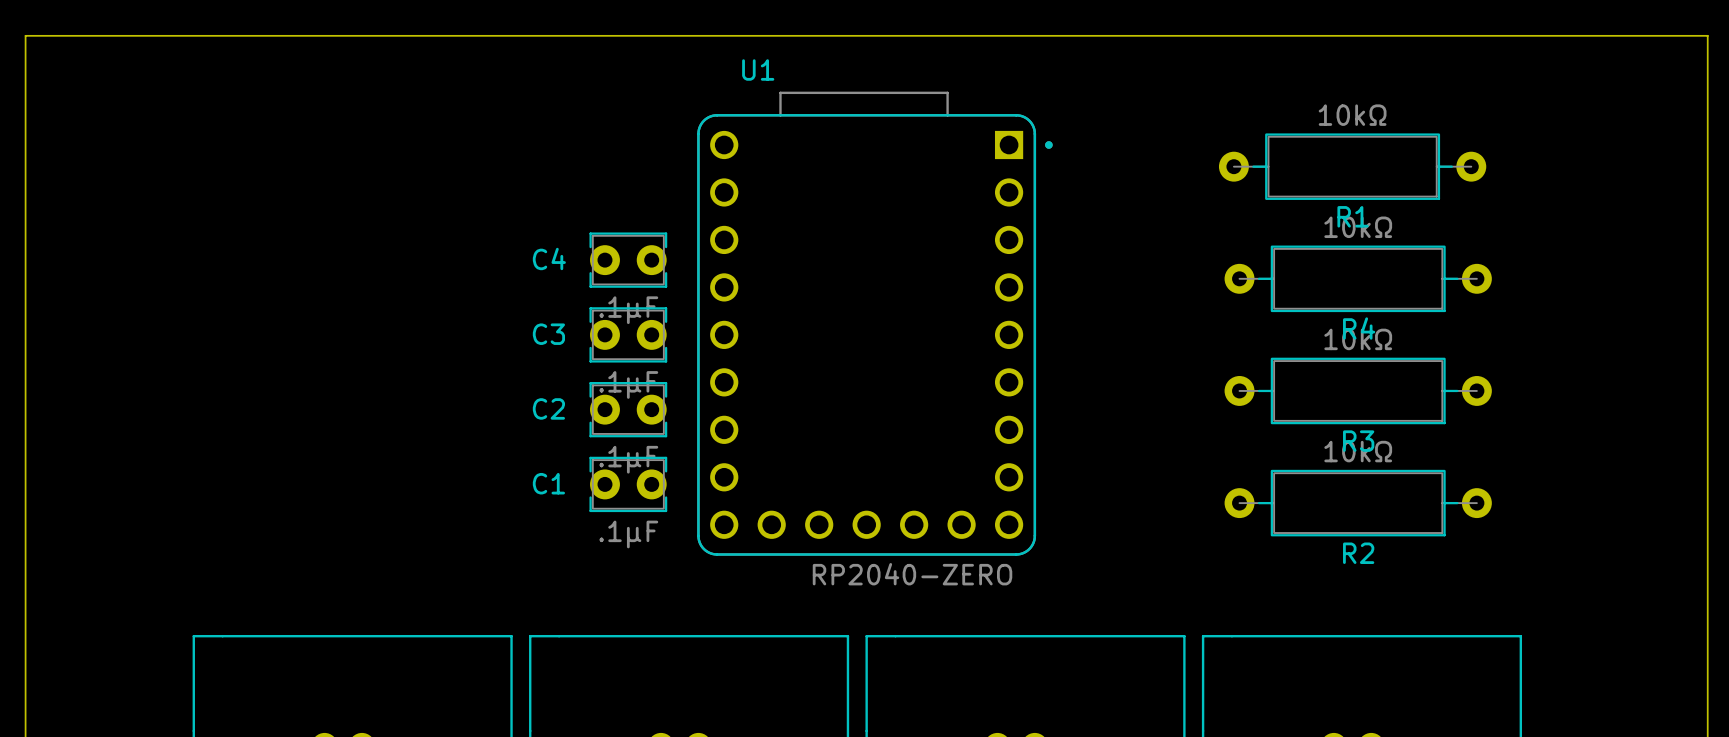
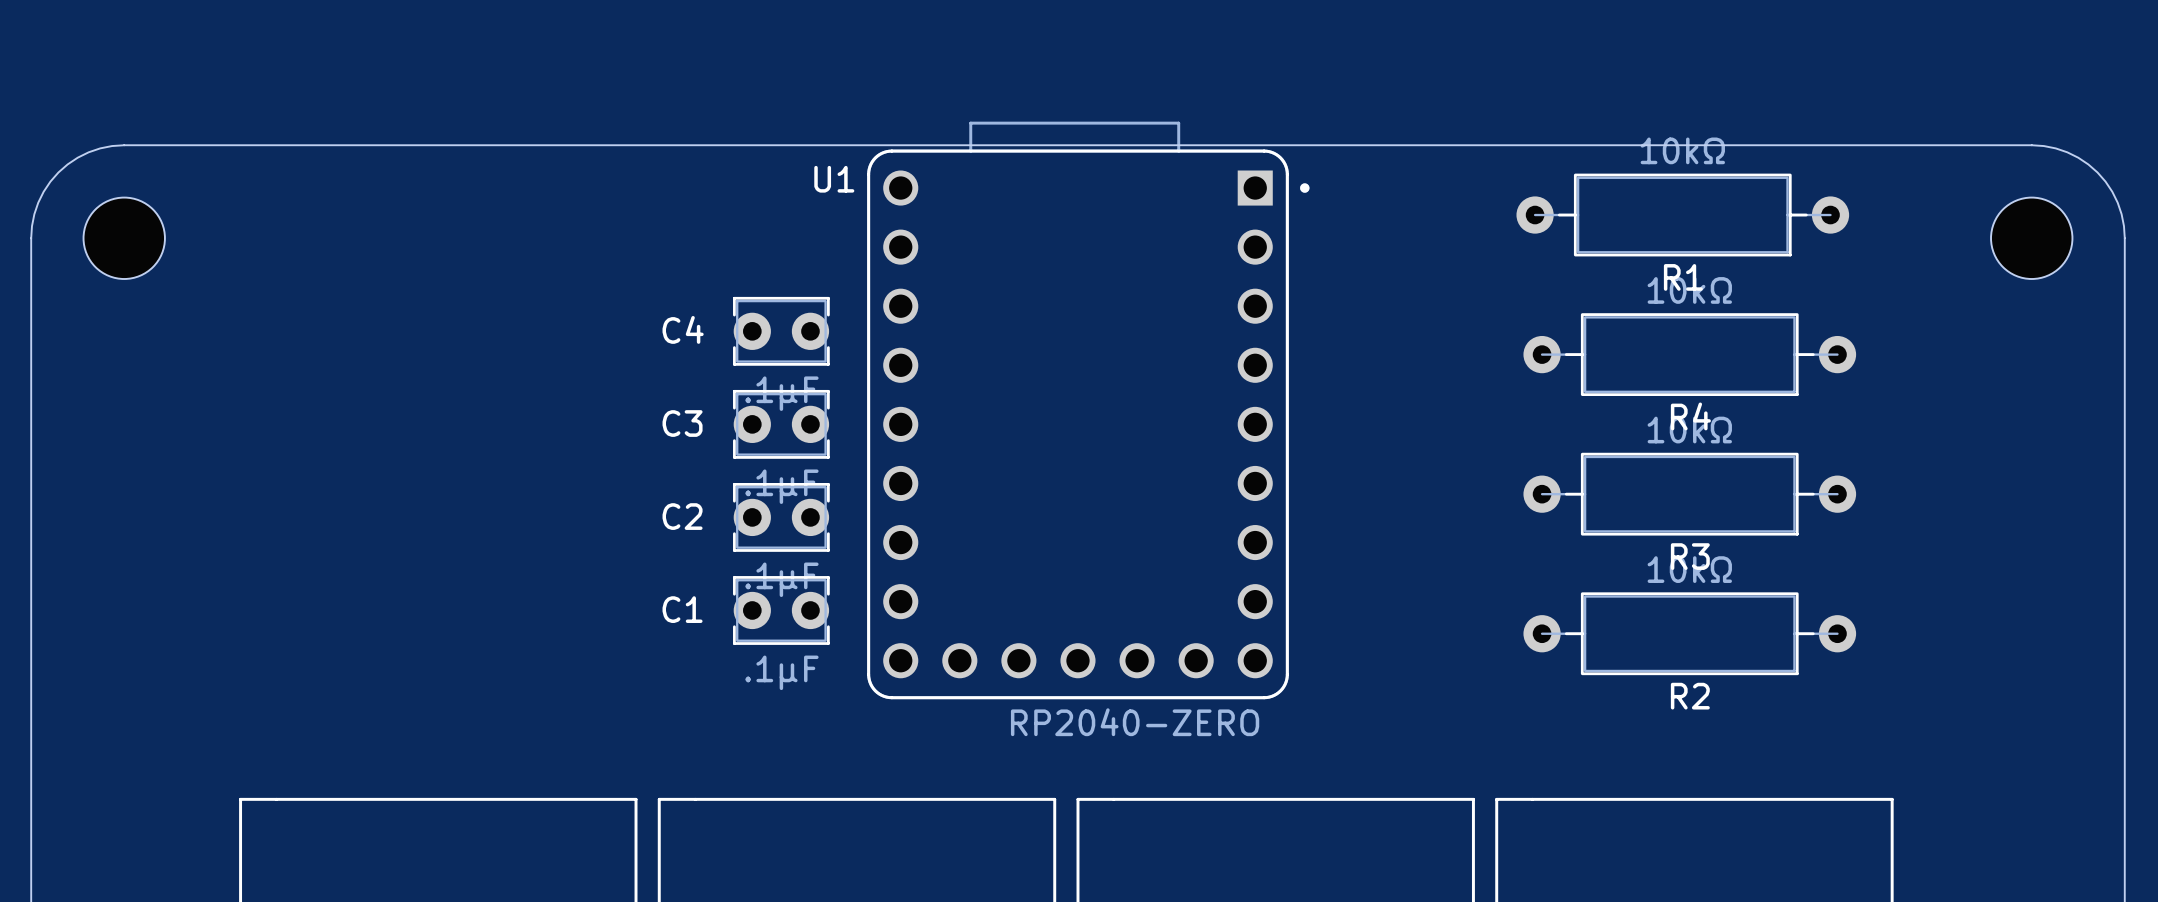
U1 name position: U1 (758, 70) -> U1 (834, 179)
board edge: (25, 185) (25, 35) (1707, 35) (1707, 185) -> (31, 238) (31, 226) (38, 202) (43, 191) (58, 172) (77, 157) (88, 152) (100, 148) (124, 145) (2031, 145) (2043, 146) (2067, 152) (2088, 164) (2097, 172) (2112, 191) (2117, 202) (2123, 226) (2124, 238)
part: none -> (124, 238)
part: none -> (2031, 238)

